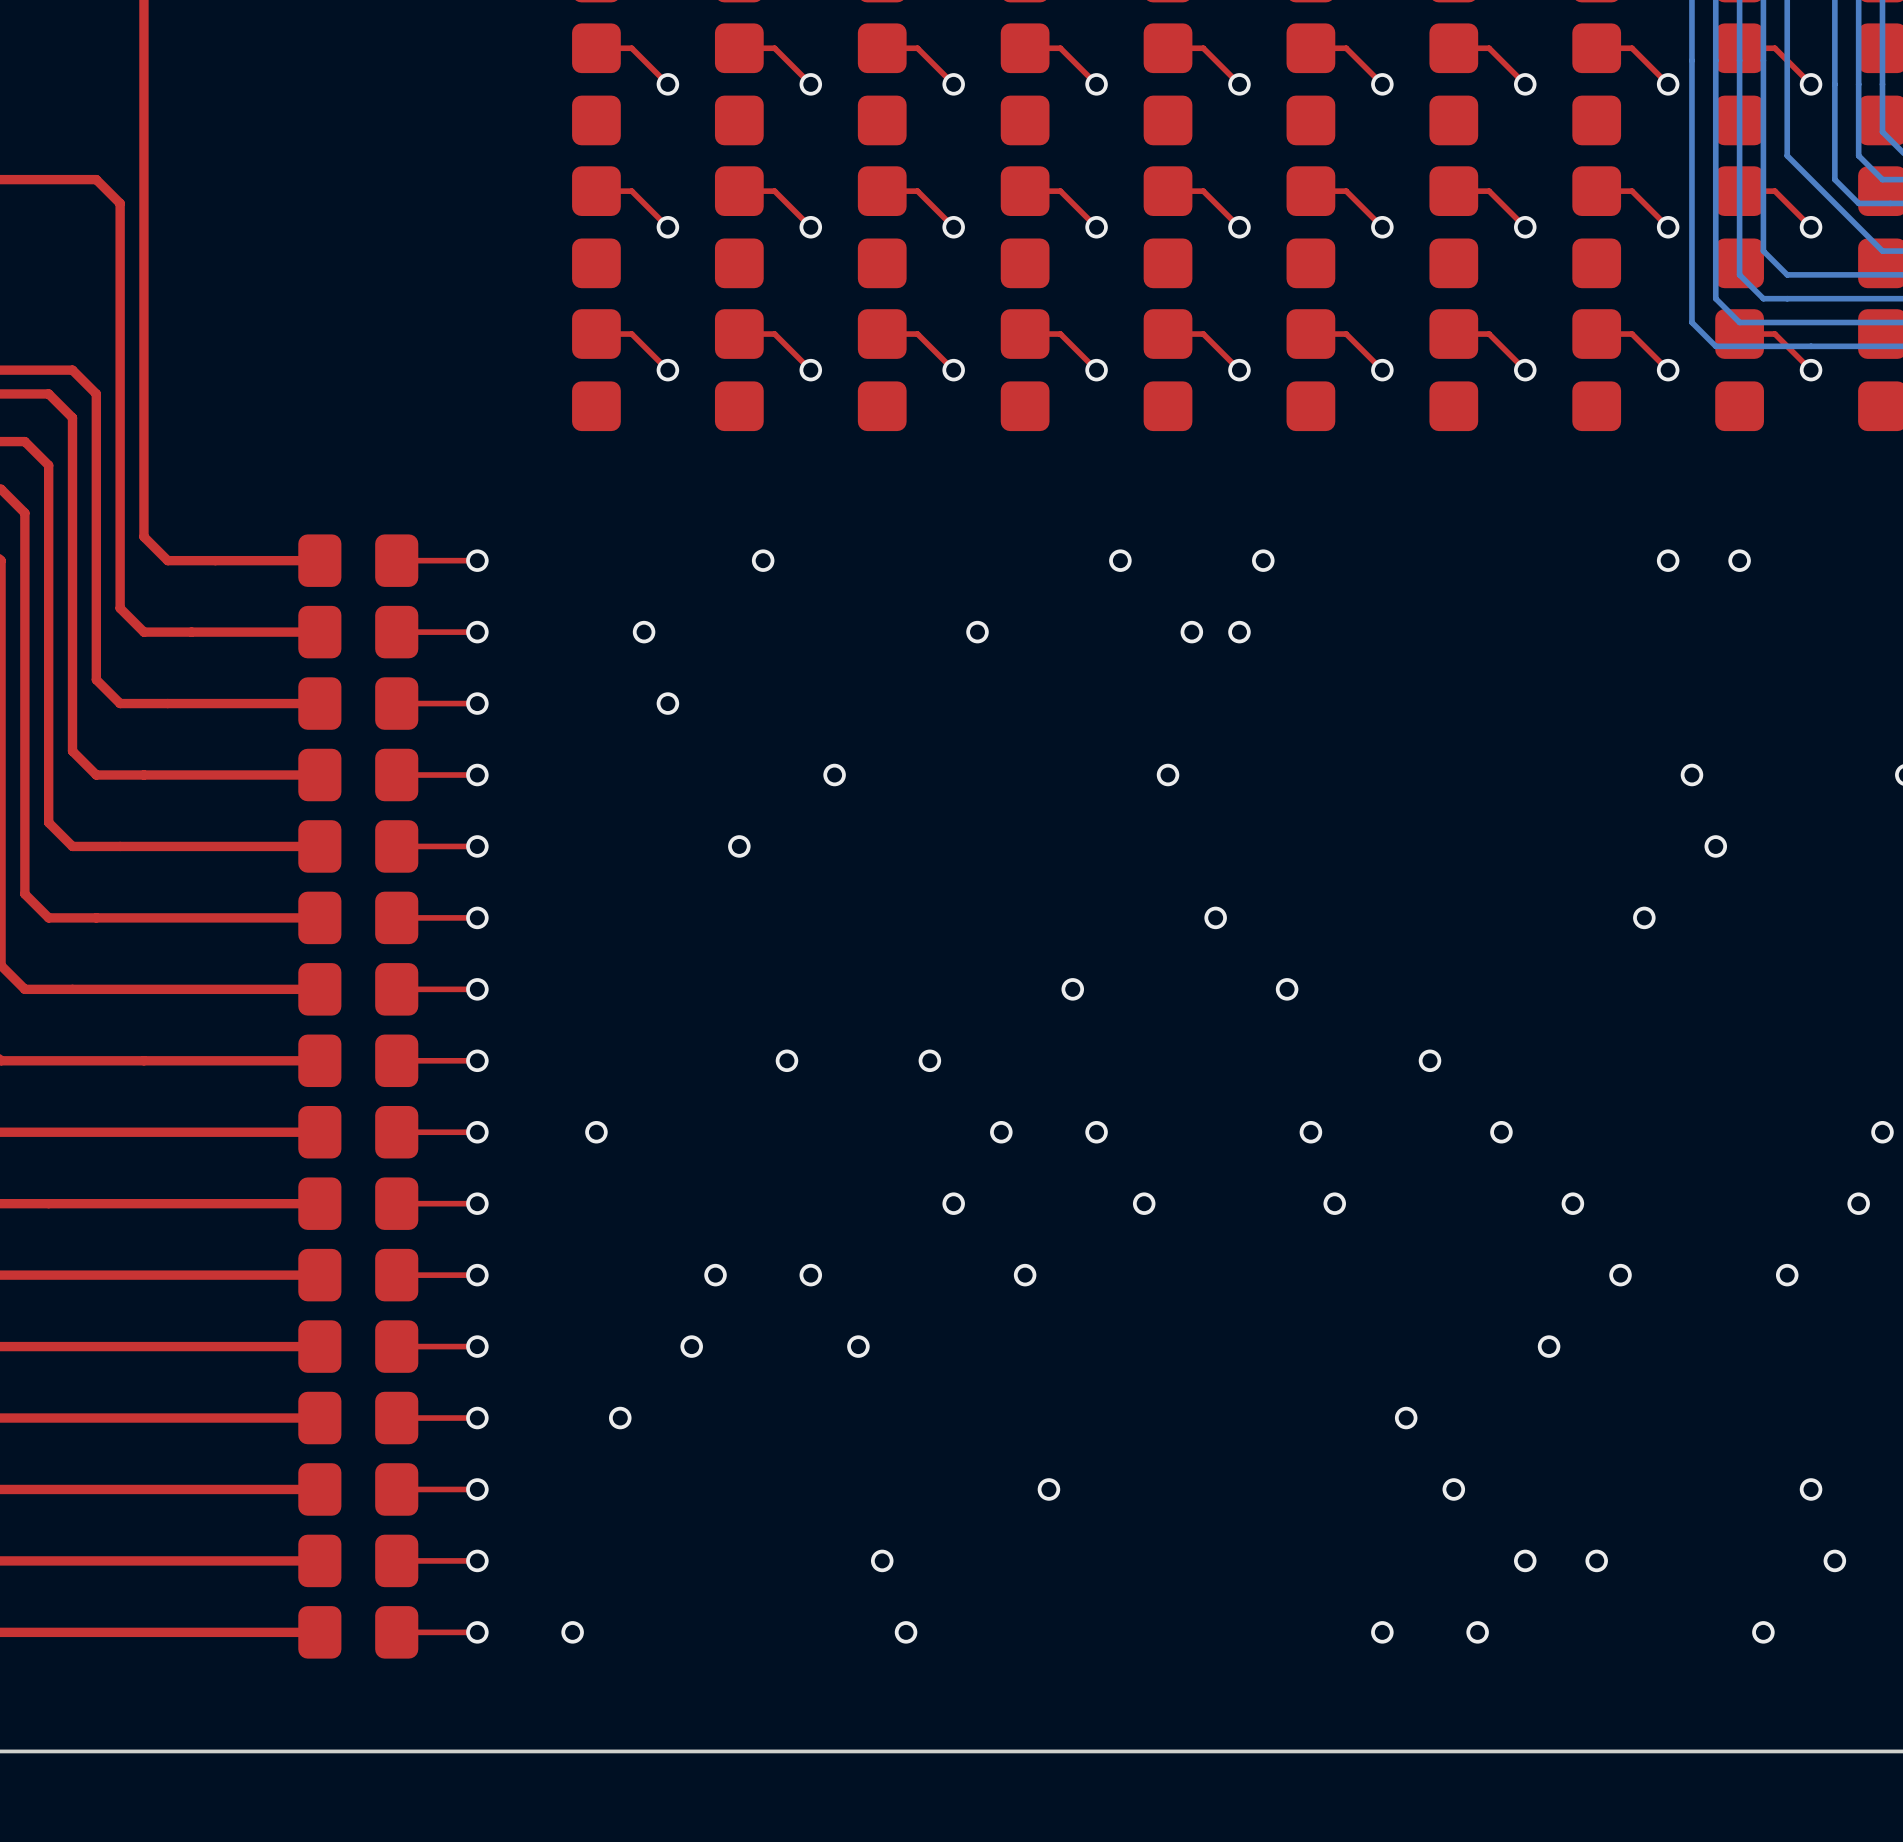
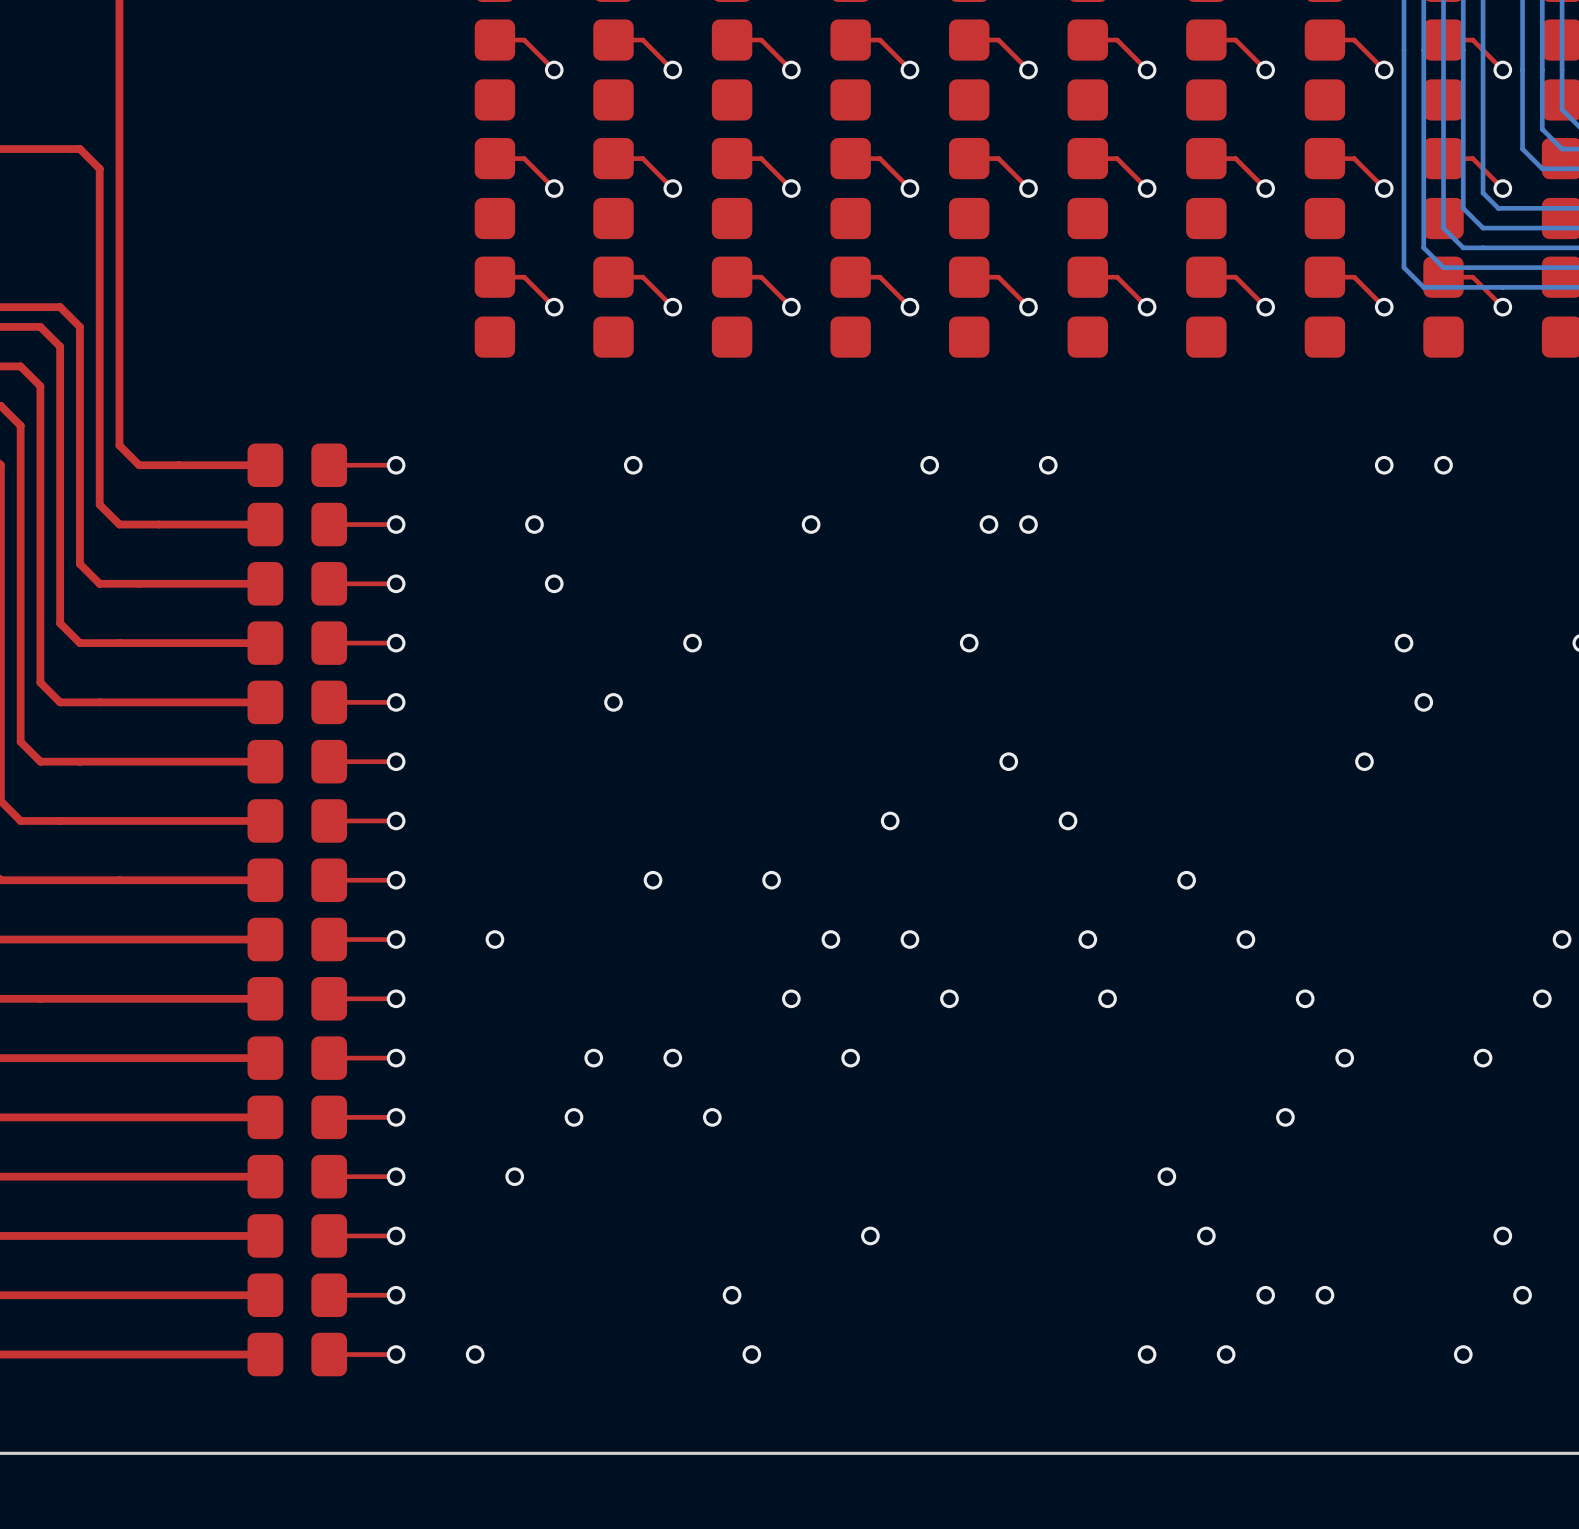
bottom track: (1787, 155) (1882, 251) -> (1483, 129) (1483, 192) (1498, 208) (1562, 208)

